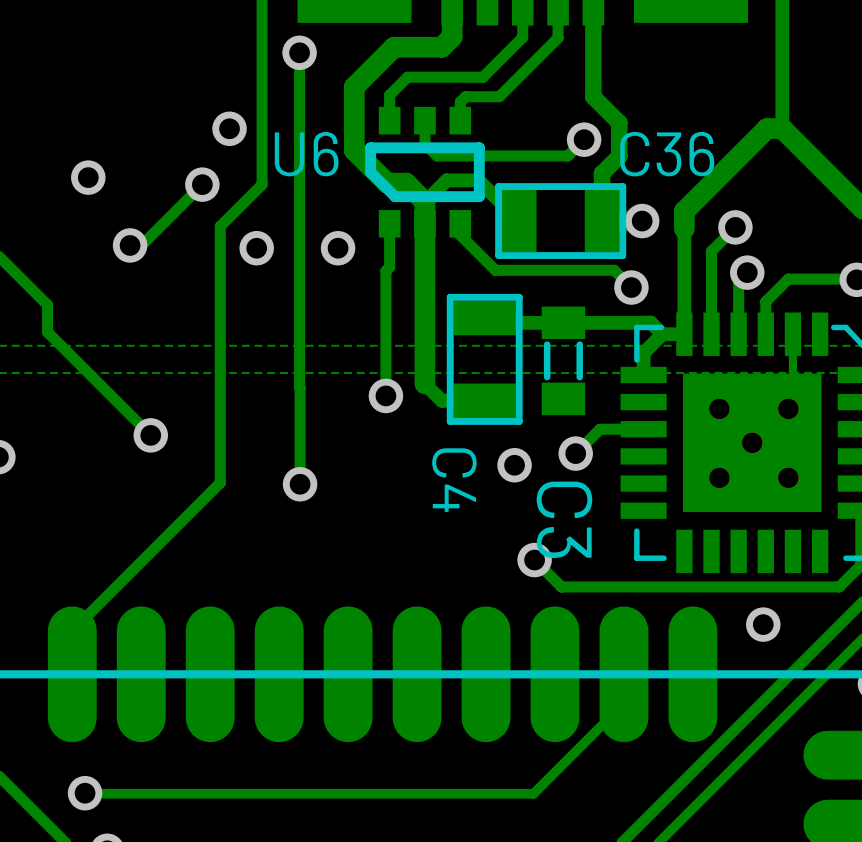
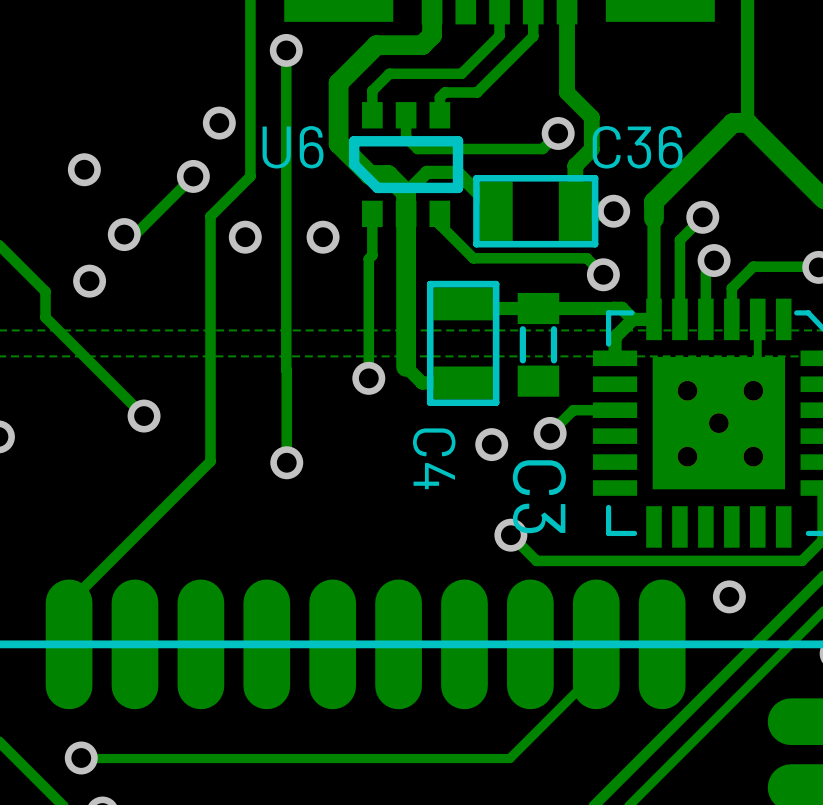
via: none -> (89, 281)

